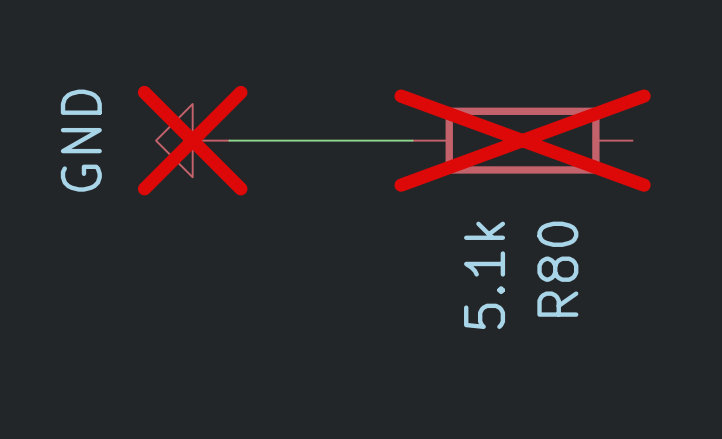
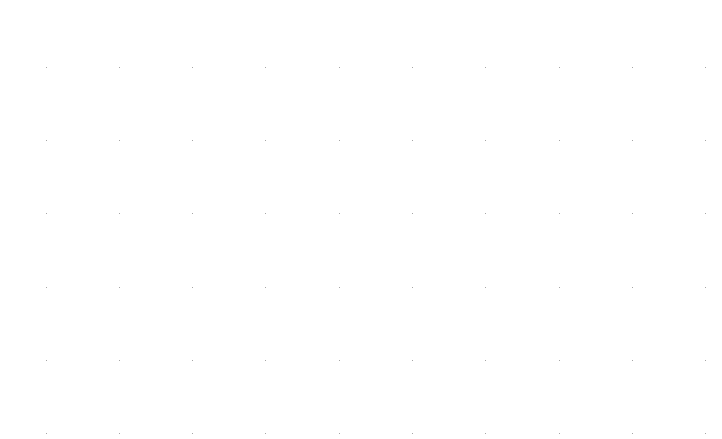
power symbol: GND (192, 140) -> none
wire: (229, 140) (412, 140) -> none
R80: 5.1k (522, 140) -> none

